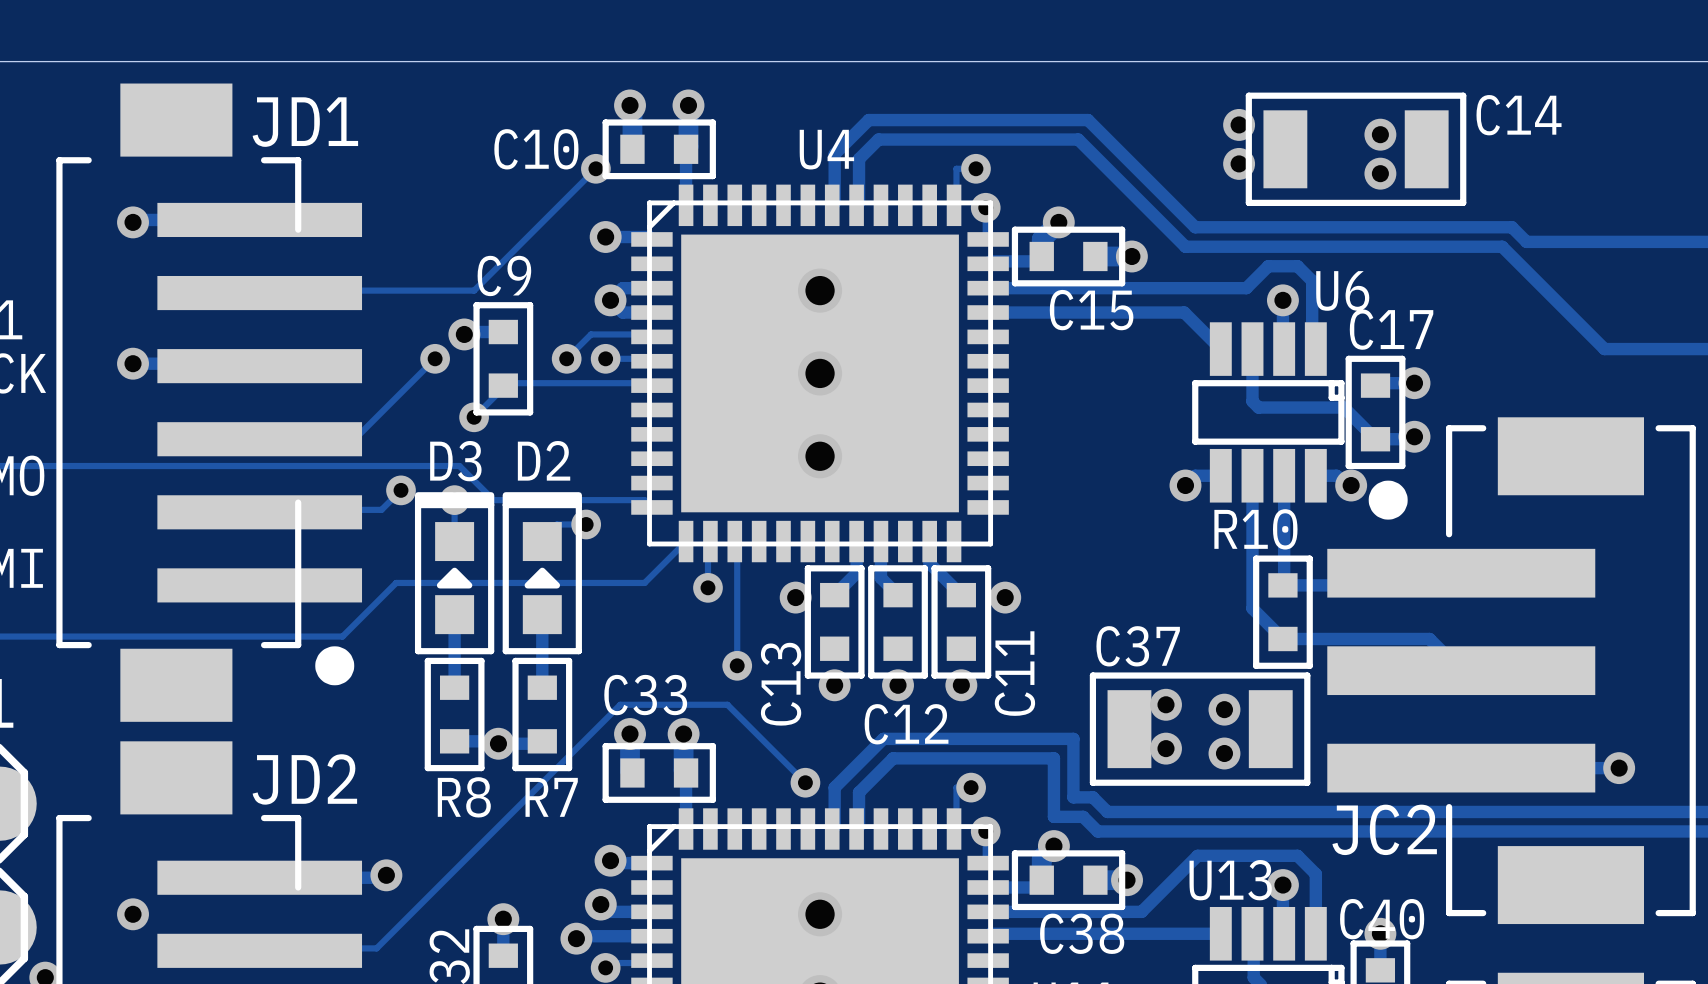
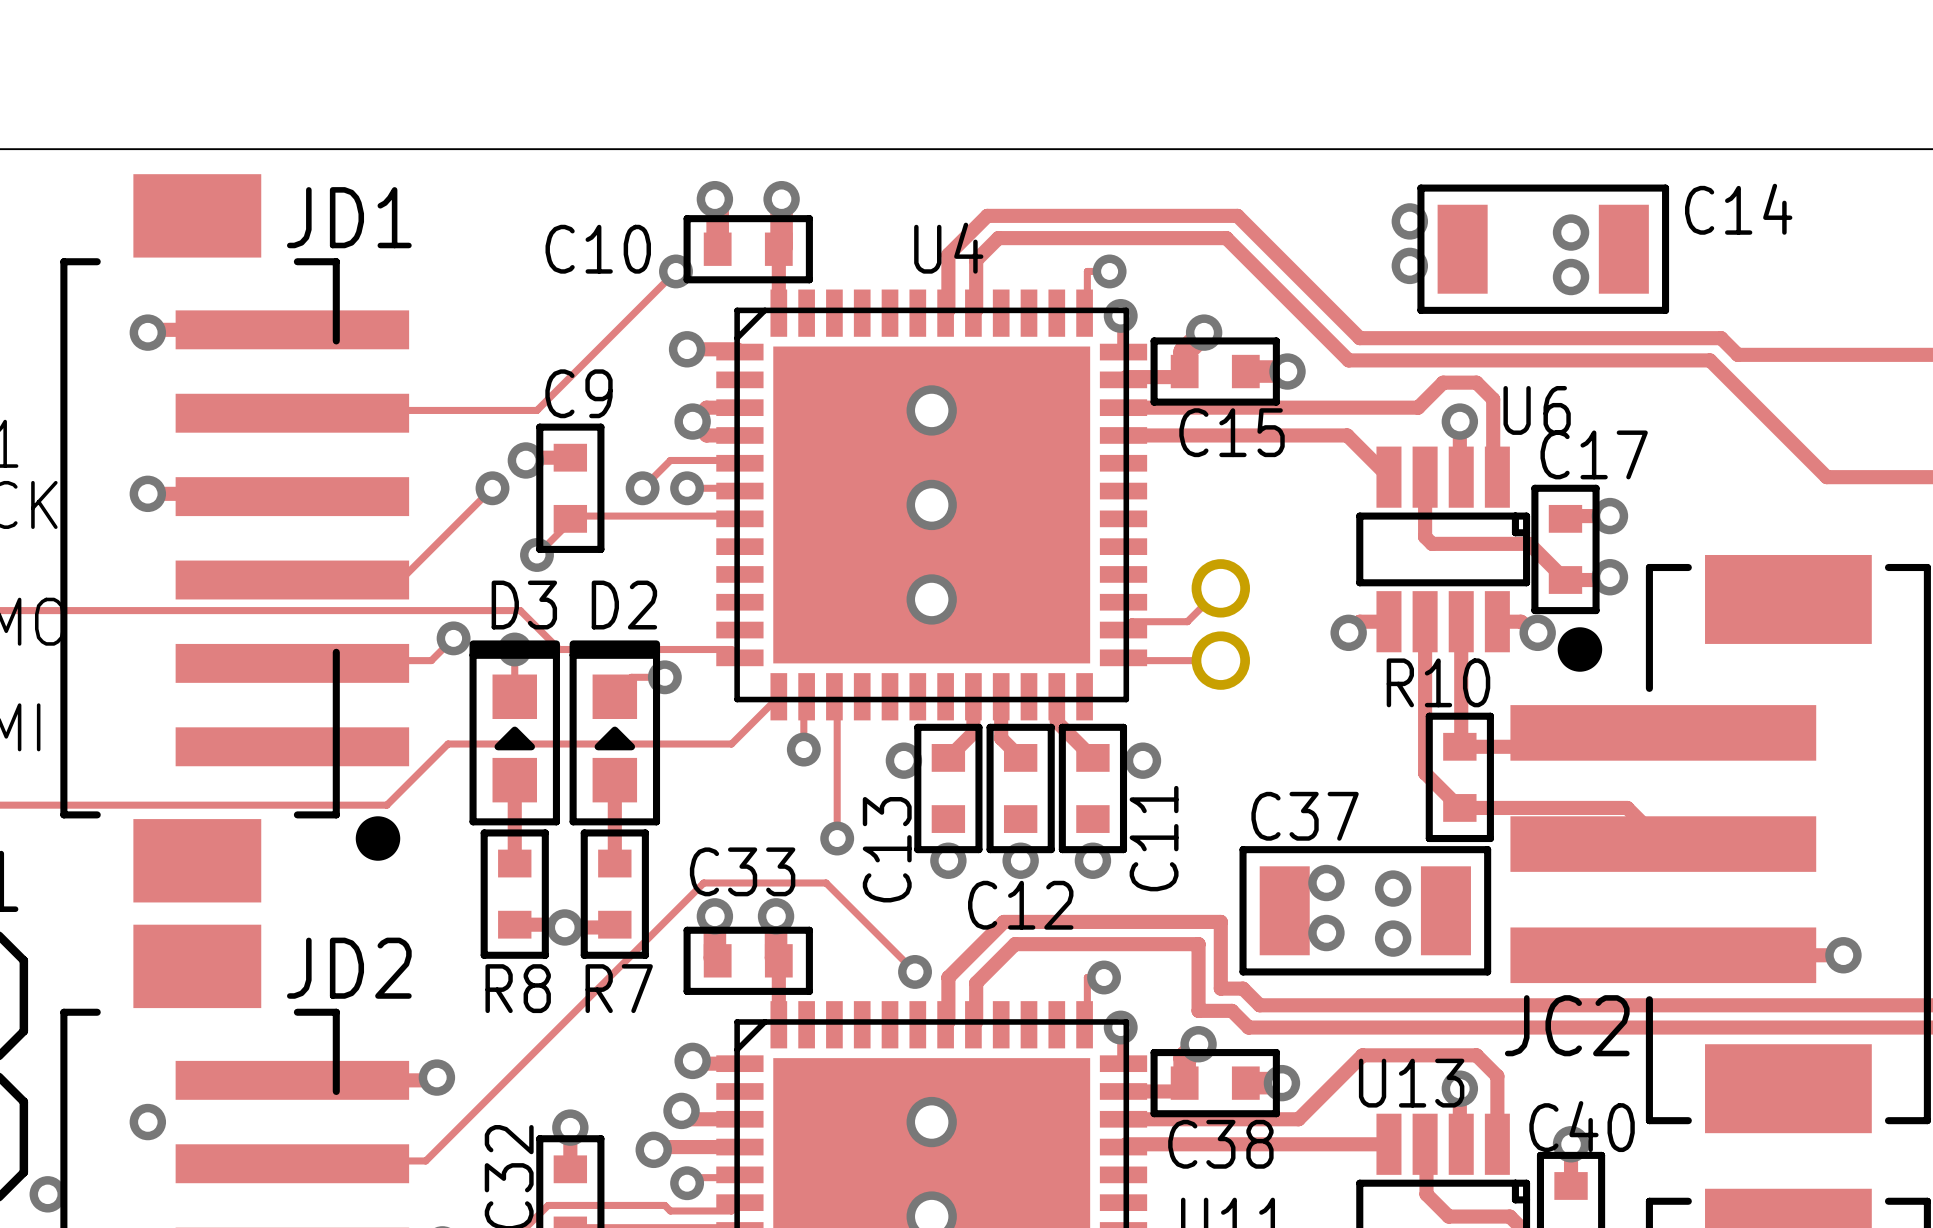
track: none -> (1220, 588) (1187, 621) (1131, 621) (1123, 630)
part: none -> (1220, 588)
track: none -> (1123, 657) (1126, 660) (1220, 660)
part: none -> (1220, 660)

